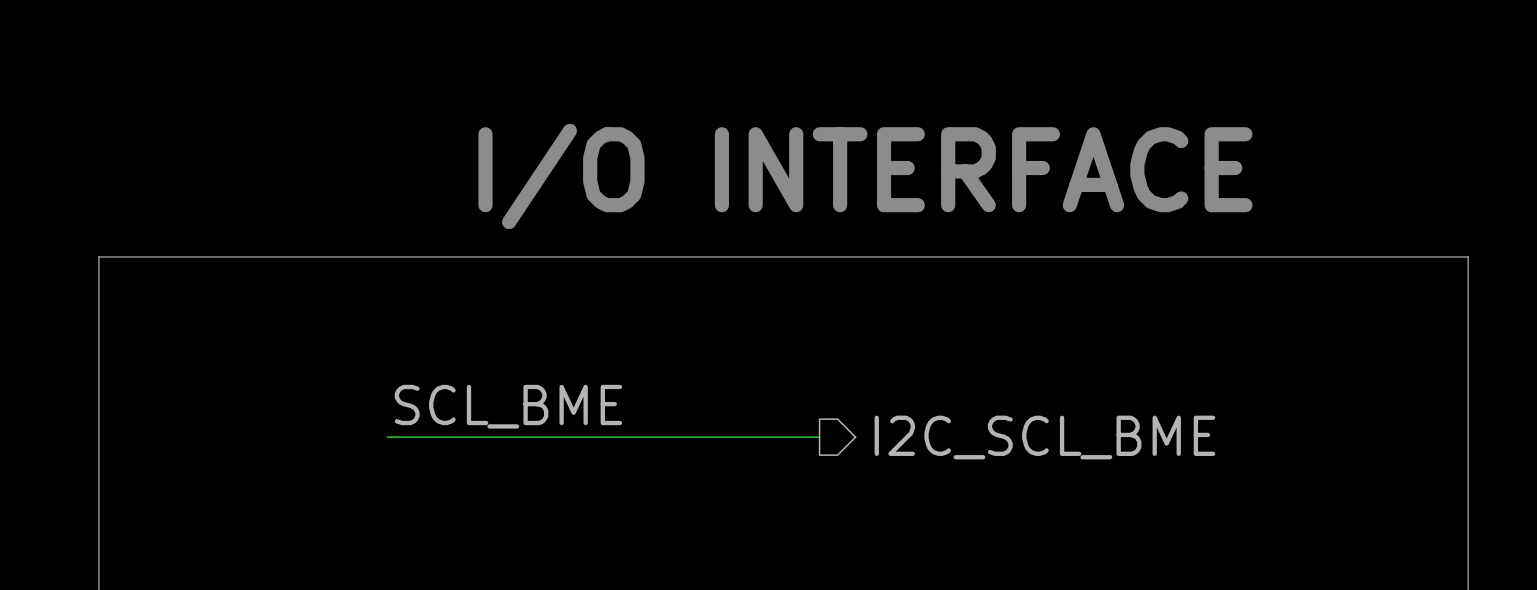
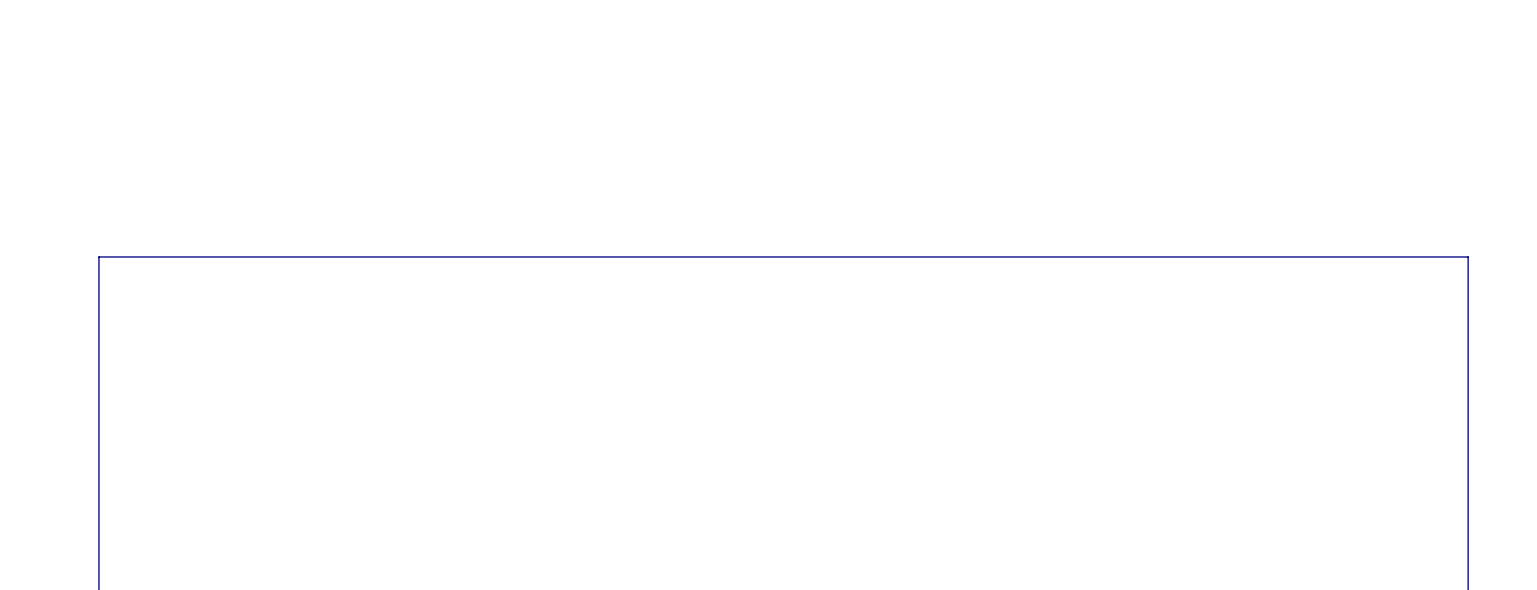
text: I/O INTERFACE (865, 176) -> none
label: SCL_BME (508, 406) -> none
wire: (387, 437) (819, 437) -> none
hierarchical label: I2C_SCL_BME (1044, 437) -> none

